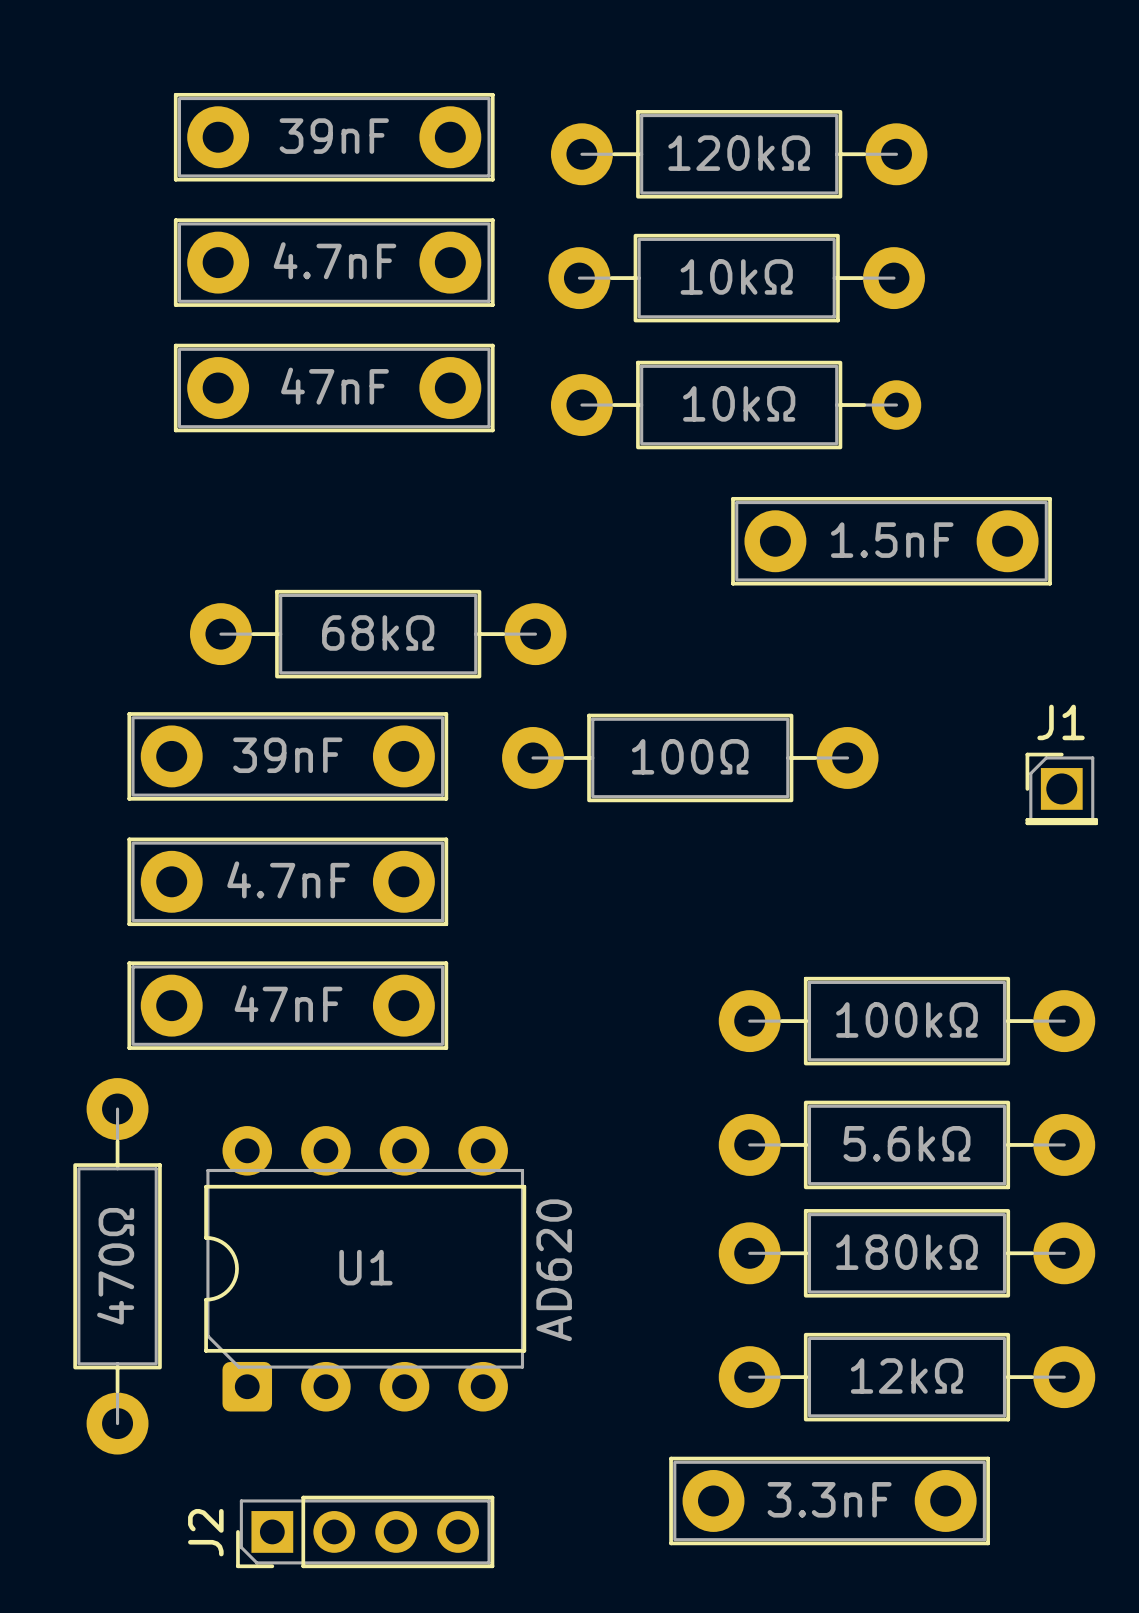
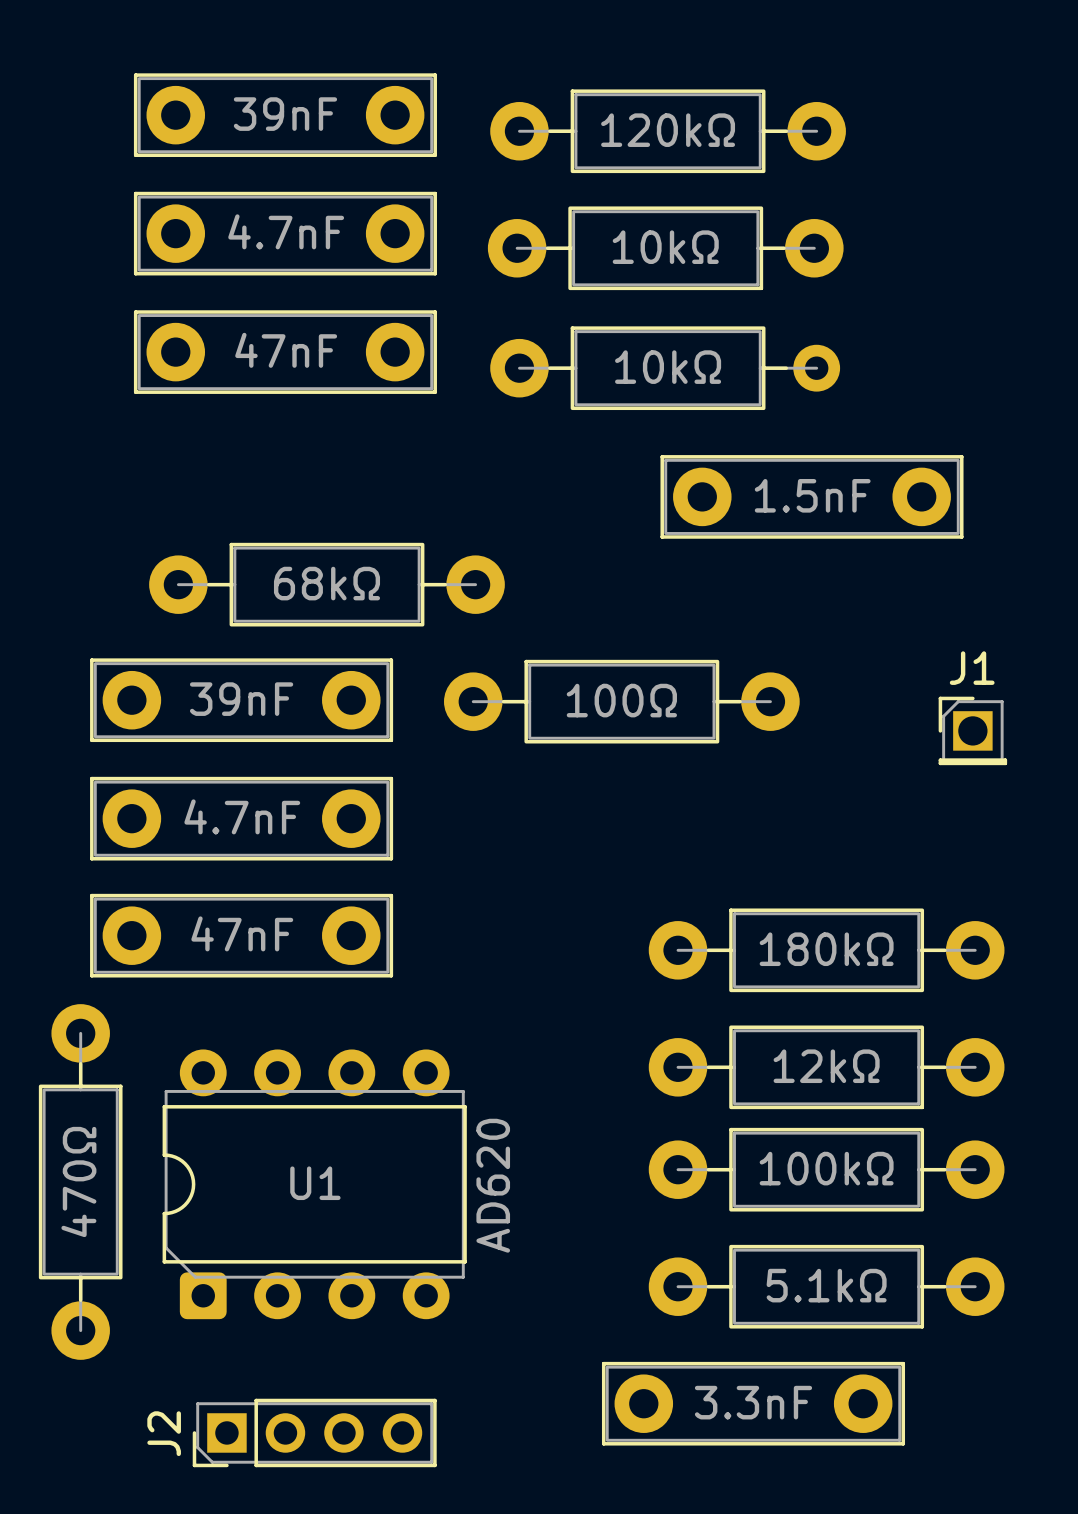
100kΩ name: 100kΩ (906, 1019) -> 180kΩ (826, 949)
5.6kΩ name: 5.6kΩ (906, 1143) -> 12kΩ (826, 1066)
180kΩ name: 180kΩ (906, 1252) -> 100kΩ (826, 1168)
12kΩ name: 12kΩ (906, 1375) -> 5.1kΩ (826, 1285)

